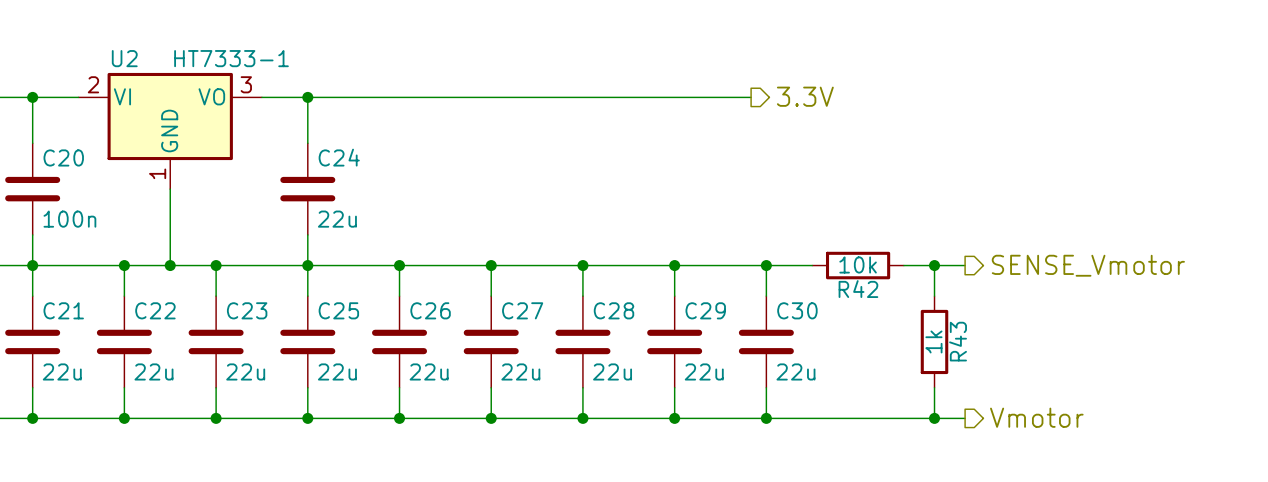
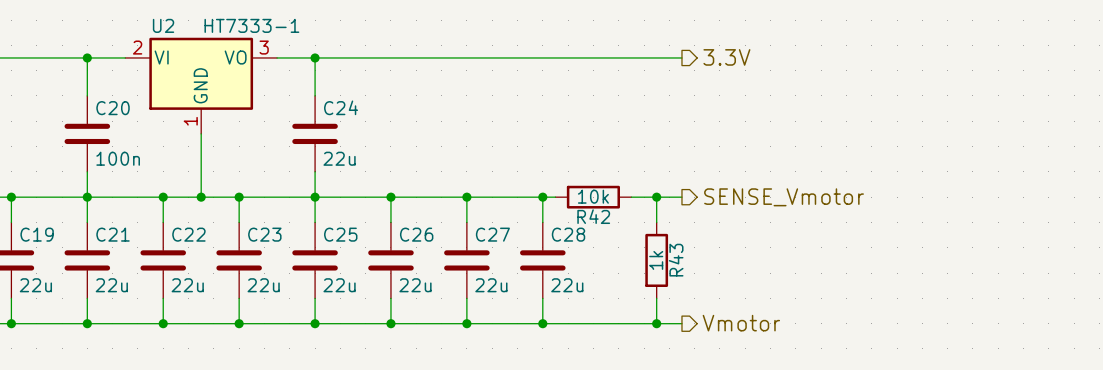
wire: (598, 265) (689, 265) -> none
wire: (674, 265) (674, 296) -> (656, 197) (656, 222)
junction: (674, 265) -> none
junction: none -> (656, 197)
wire: (751, 265) (812, 265) -> none
wire: (766, 265) (766, 296) -> none
junction: (766, 265) -> none
R42 position: (858, 265) -> (593, 197)
wire: (903, 265) (965, 265) -> none
wire: (934, 265) (934, 296) -> none
junction: (934, 265) -> none
hierarchical label position: SENSE_Vmotor (1088, 265) -> SENSE_Vmotor (784, 197)
C29: 22u (674, 341) -> none
C30: 22u (766, 341) -> none
R43 position: (934, 341) -> (656, 260)
wire: (674, 387) (674, 418) -> (656, 298) (656, 323)
wire: (766, 387) (766, 418) -> none
wire: (934, 387) (934, 418) -> none
hierarchical label position: Vmotor (1036, 417) -> Vmotor (741, 323)
junction: (674, 418) -> none
junction: none -> (656, 323)
wire: (751, 418) (965, 418) -> none
junction: (766, 418) -> none
junction: (934, 418) -> none

